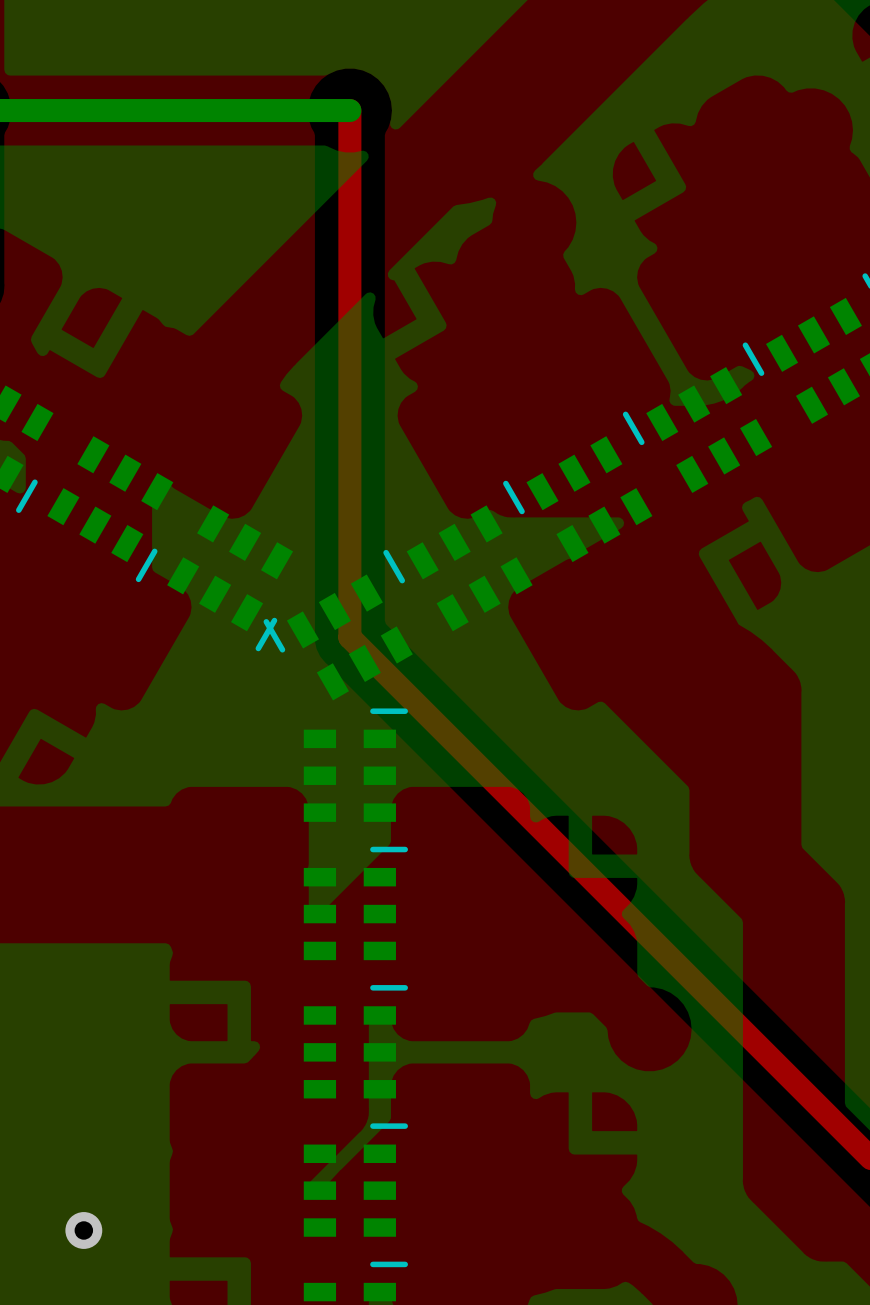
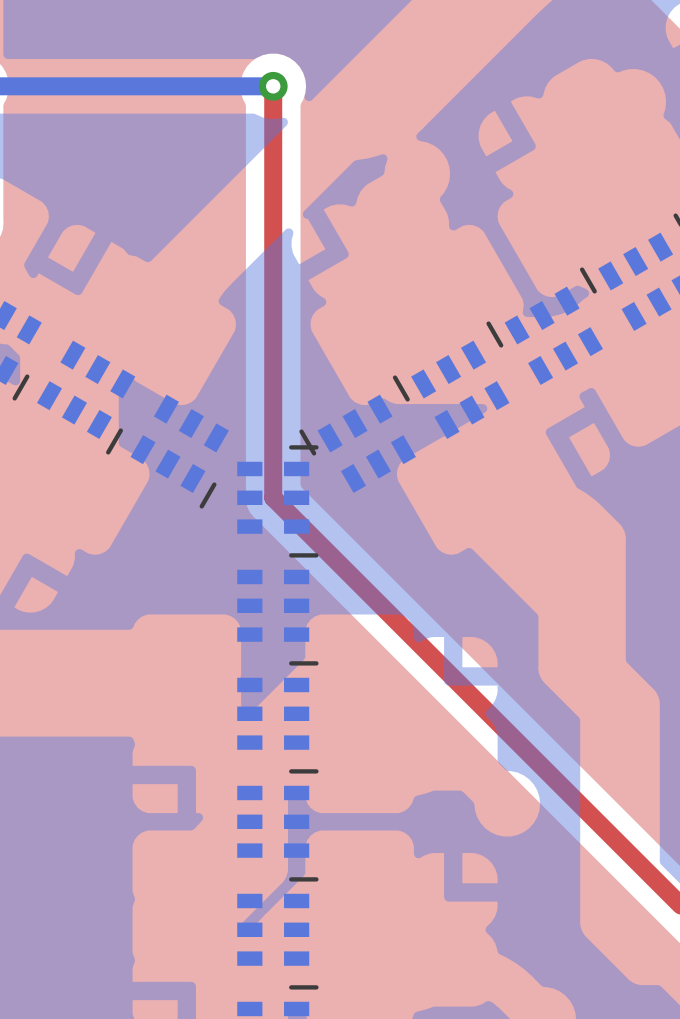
via: none -> (273, 86)
part rotation: 0° (338, 637) -> 120° clockwise (277, 489)
via: (83, 1230) -> none

